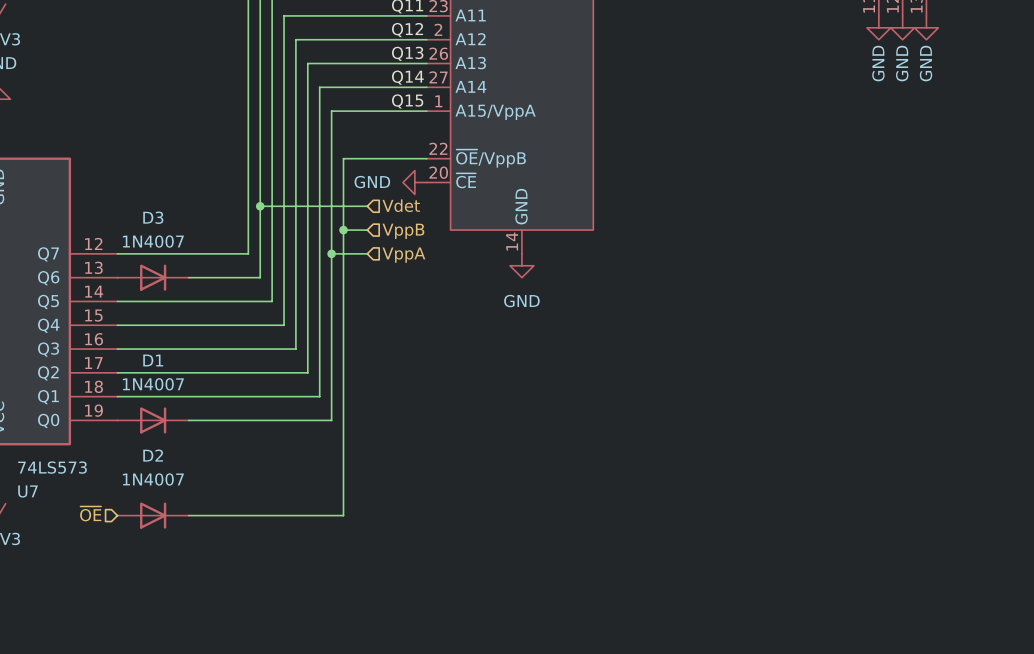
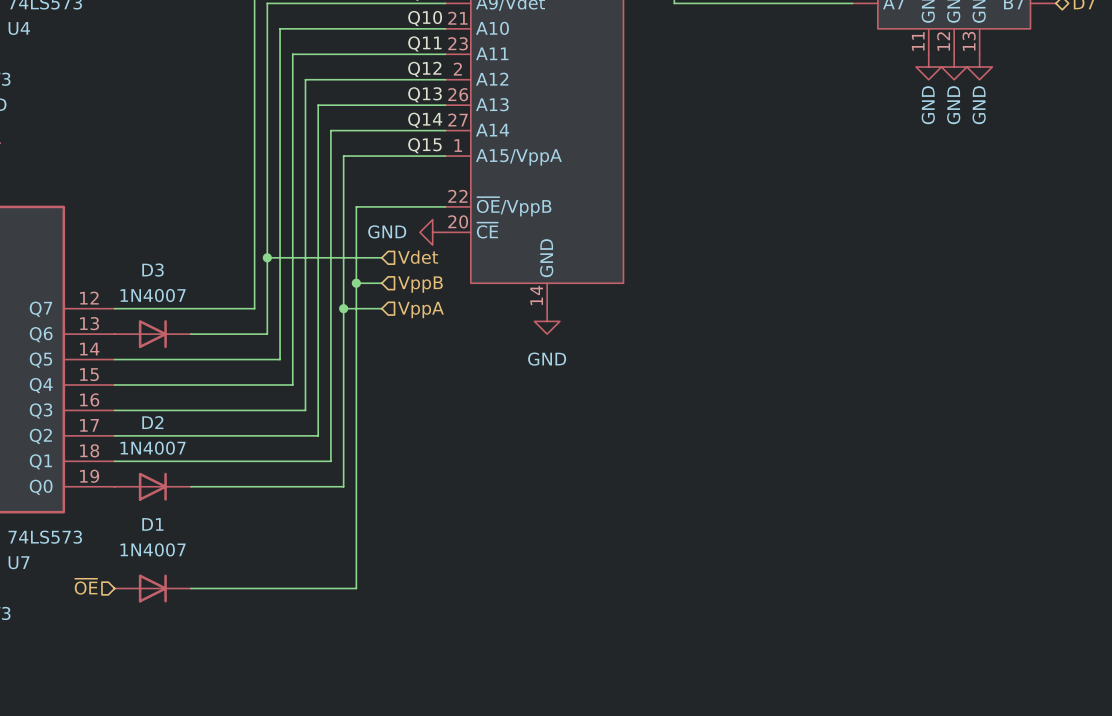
D1 name: D1 (153, 360) -> D2 (152, 422)
D2 name: D2 (153, 455) -> D1 (152, 524)

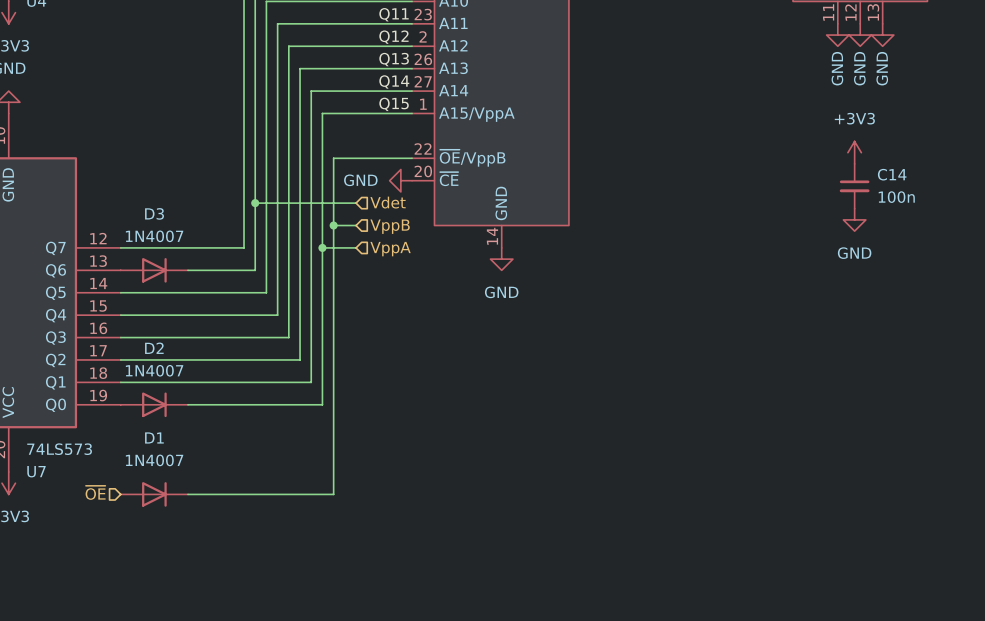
power symbol: none -> +3V3 (854, 152)
C14: none -> 100n (854, 186)
power symbol: none -> GND (854, 219)

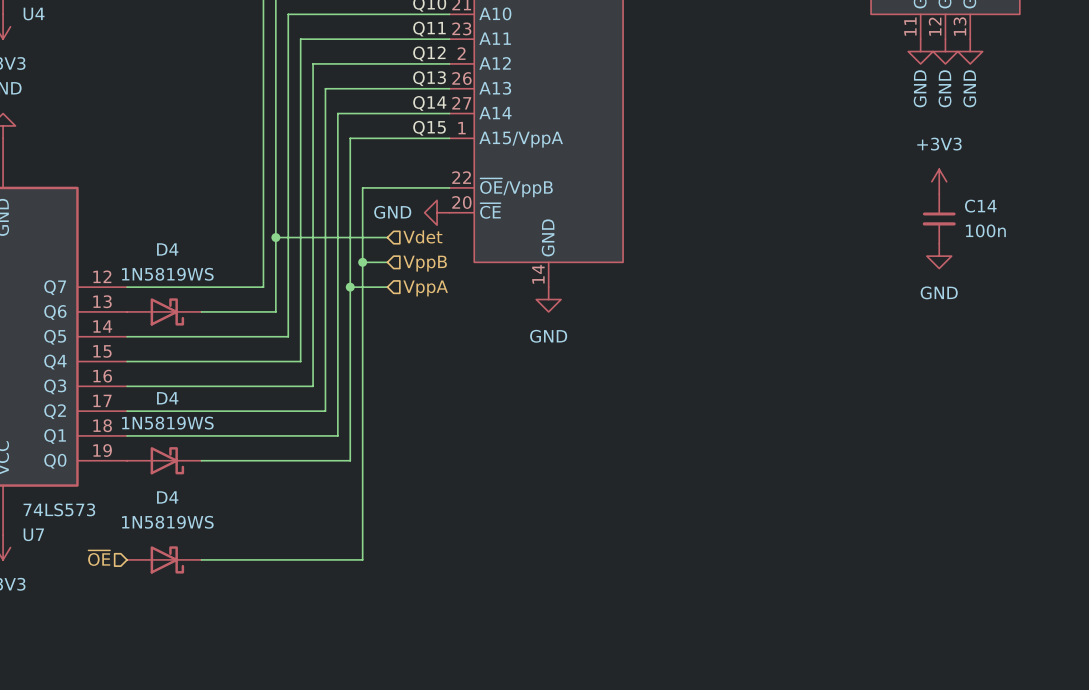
D3: 1N4007 (154, 270) -> none
D4: none -> 1N5819WS (164, 311)
D2: 1N4007 (154, 404) -> none
D4: none -> 1N5819WS (164, 460)
D1: 1N4007 (154, 494) -> none
D4: none -> 1N5819WS (164, 559)

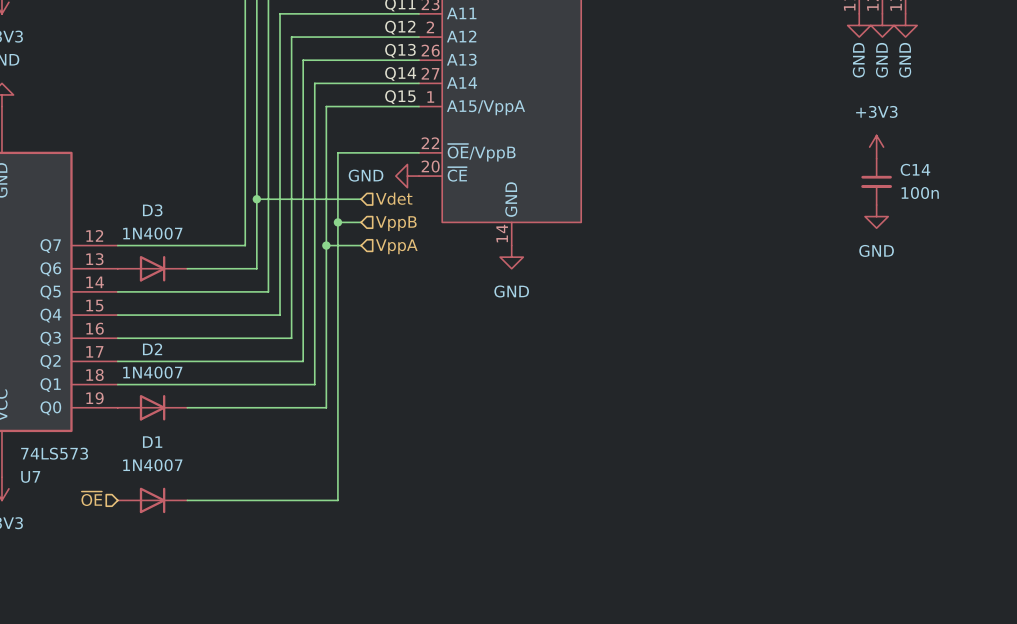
D4: 1N5819WS (164, 311) -> none
D3: none -> 1N4007 (152, 268)
D4: 1N5819WS (164, 460) -> none
D2: none -> 1N4007 (152, 407)
D4: 1N5819WS (164, 559) -> none
D1: none -> 1N4007 (152, 500)

